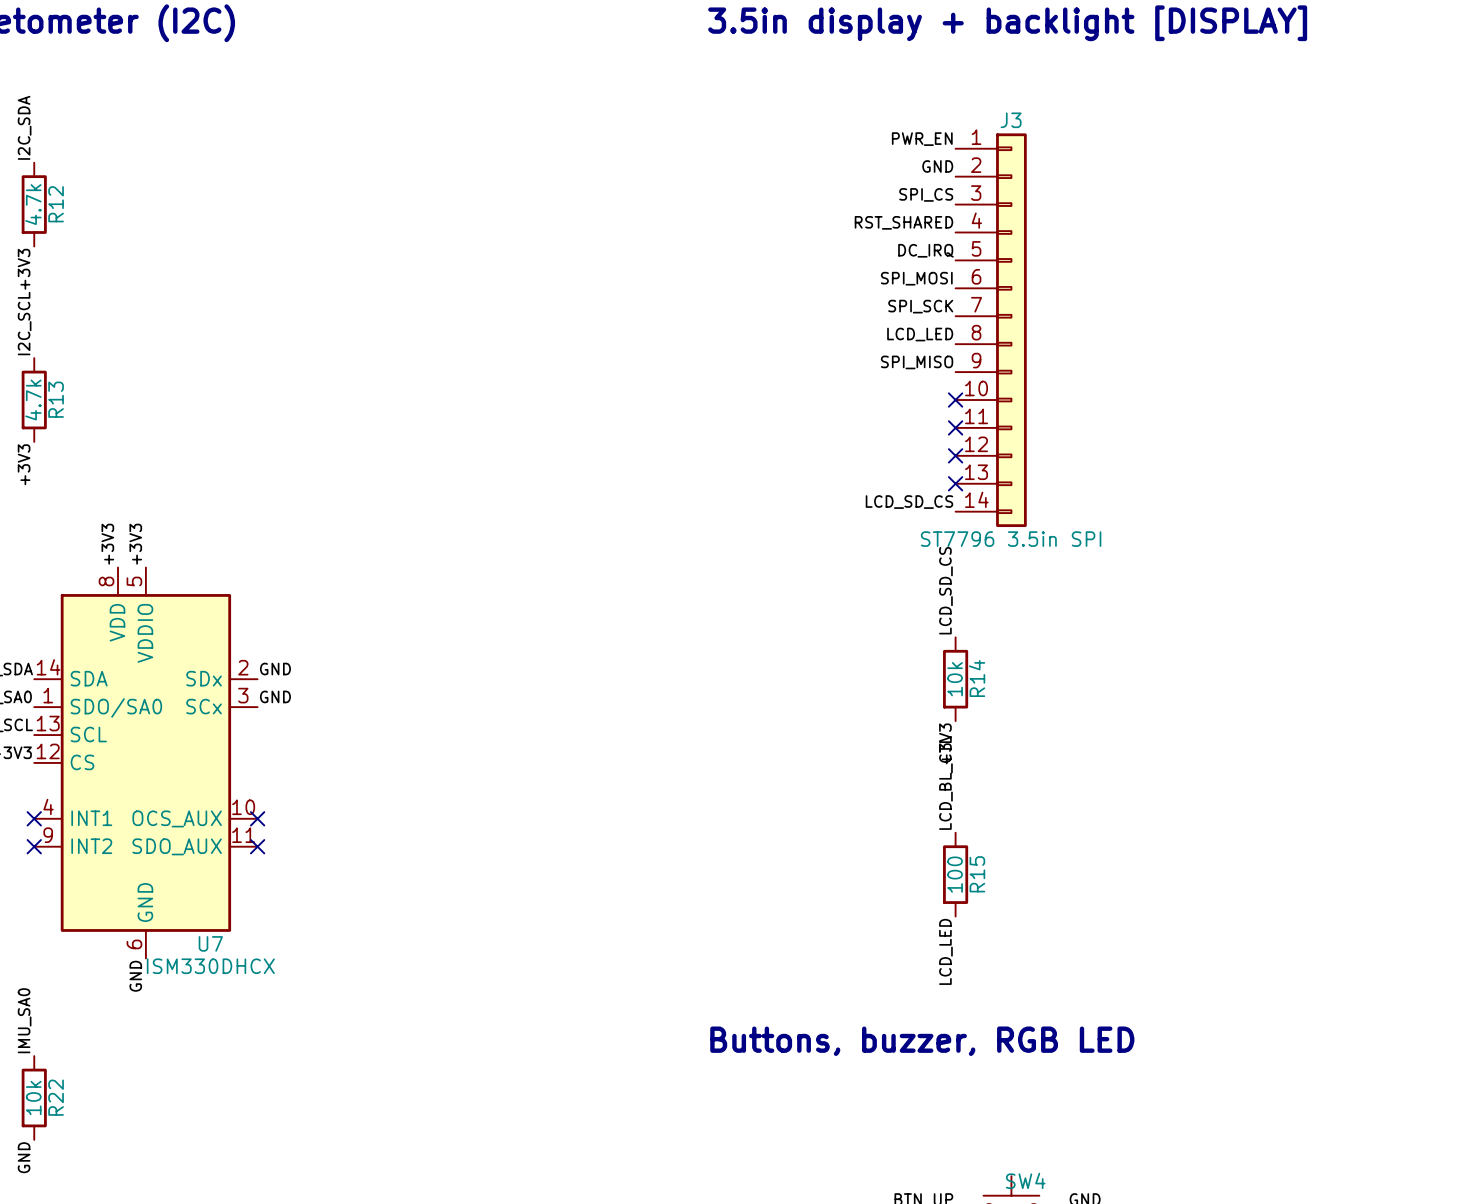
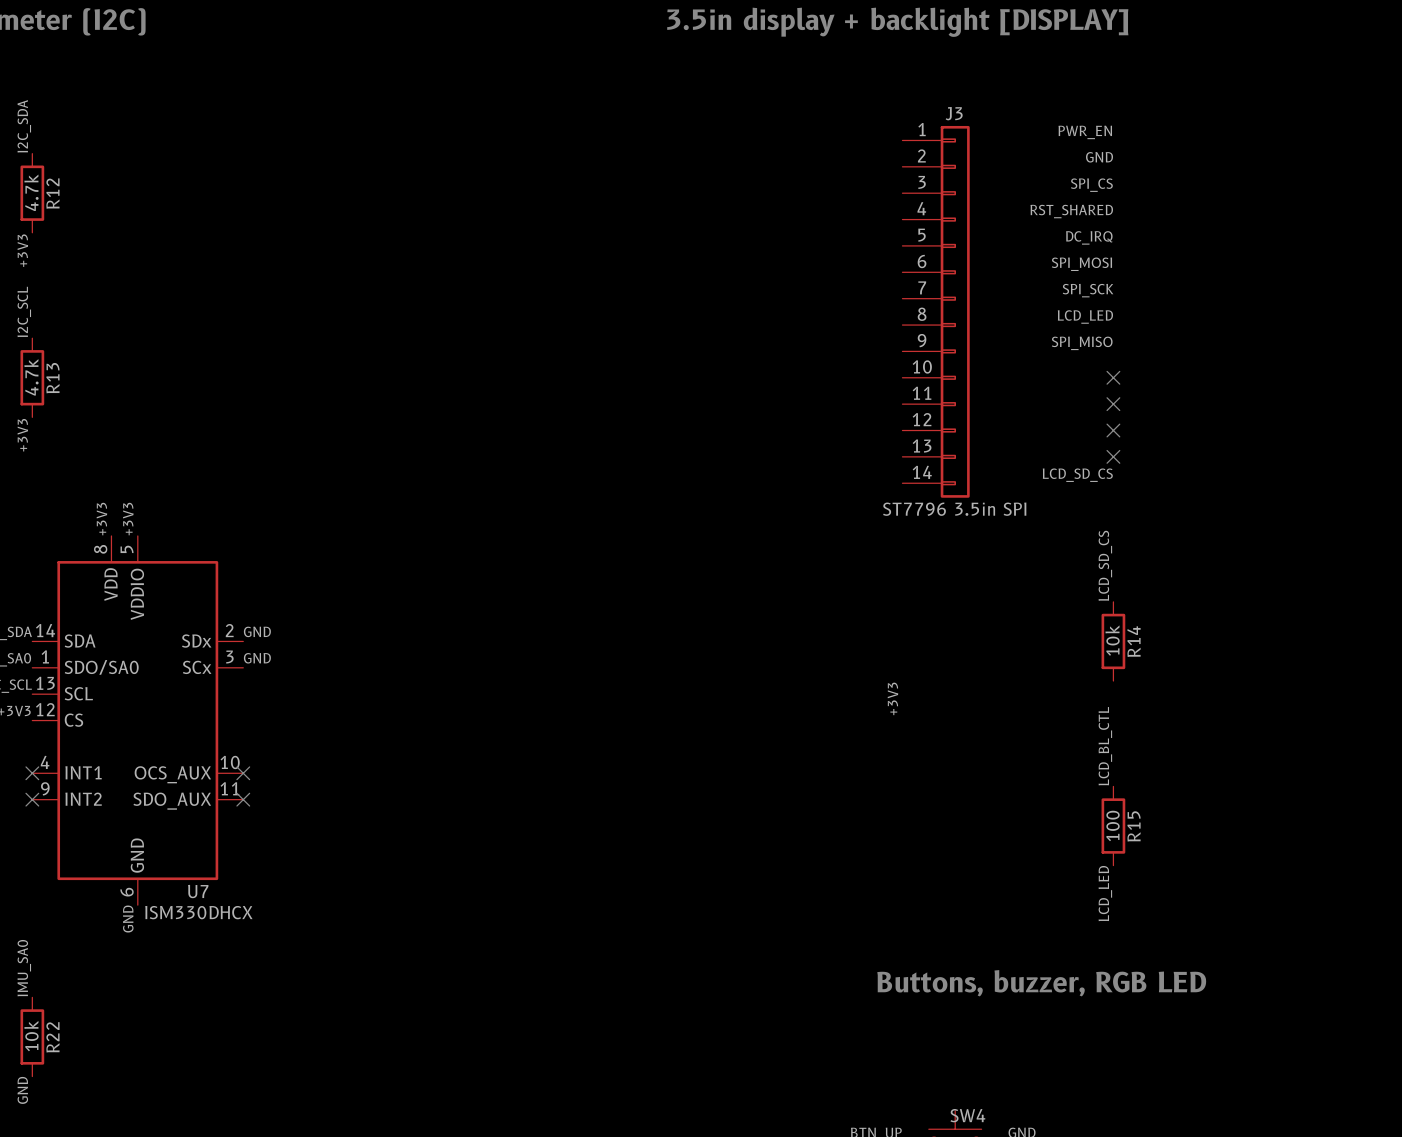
label position: PWR_EN (922, 139) -> PWR_EN (1085, 132)
label position: GND (937, 166) -> GND (1099, 157)
label position: SPI_CS (926, 194) -> SPI_CS (1091, 185)
label position: RST_SHARED (903, 222) -> RST_SHARED (1071, 211)
label position: DC_IRQ (925, 250) -> DC_IRQ (1089, 237)
label position: SPI_MOSI (916, 278) -> SPI_MOSI (1081, 264)
label position: SPI_SCK (920, 306) -> SPI_SCK (1088, 290)
label position: LCD_LED (920, 334) -> LCD_LED (1085, 316)
label position: SPI_MISO (917, 362) -> SPI_MISO (1082, 343)
no-connect mark: (955, 400) -> none
no-connect mark: none -> (1113, 377)
no-connect mark: (955, 427) -> none
no-connect mark: none -> (1113, 404)
no-connect mark: (955, 455) -> none
no-connect mark: none -> (1113, 430)
no-connect mark: (955, 483) -> none
no-connect mark: none -> (1113, 456)
label: LCD_SD_CS (909, 502) -> none
label: none -> LCD_SD_CS (1077, 475)
label: LCD_SD_CS (945, 590) -> none
label: none -> LCD_SD_CS (1105, 565)
R14 position: (955, 679) -> (1113, 641)
label position: LCD_BL_CTL (945, 782) -> LCD_BL_CTL (1105, 746)
R15 position: (955, 874) -> (1113, 826)
label position: LCD_LED (945, 951) -> LCD_LED (1105, 893)
text position: Buttons, buzzer, RGB LED (922, 1041) -> Buttons, buzzer, RGB LED (1041, 983)

